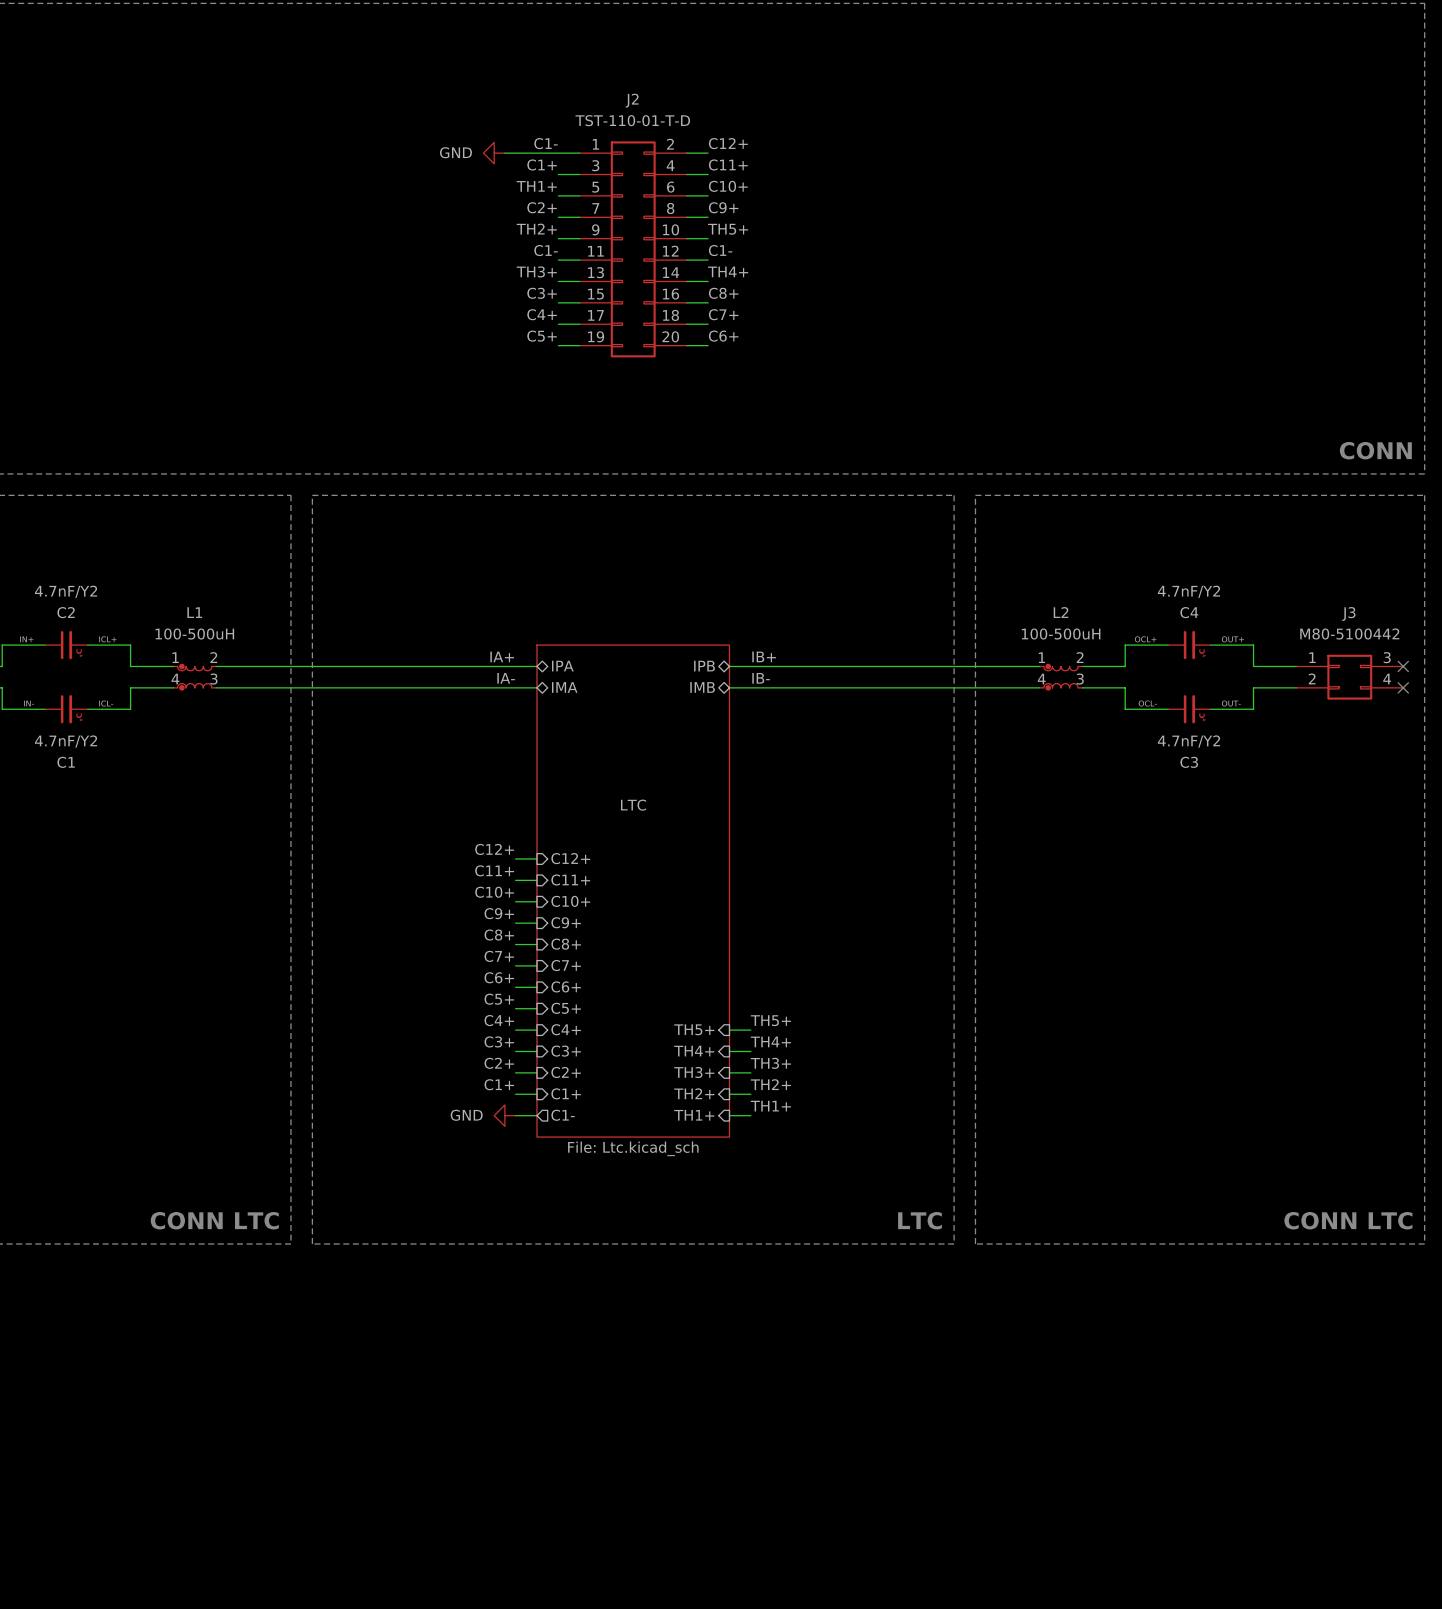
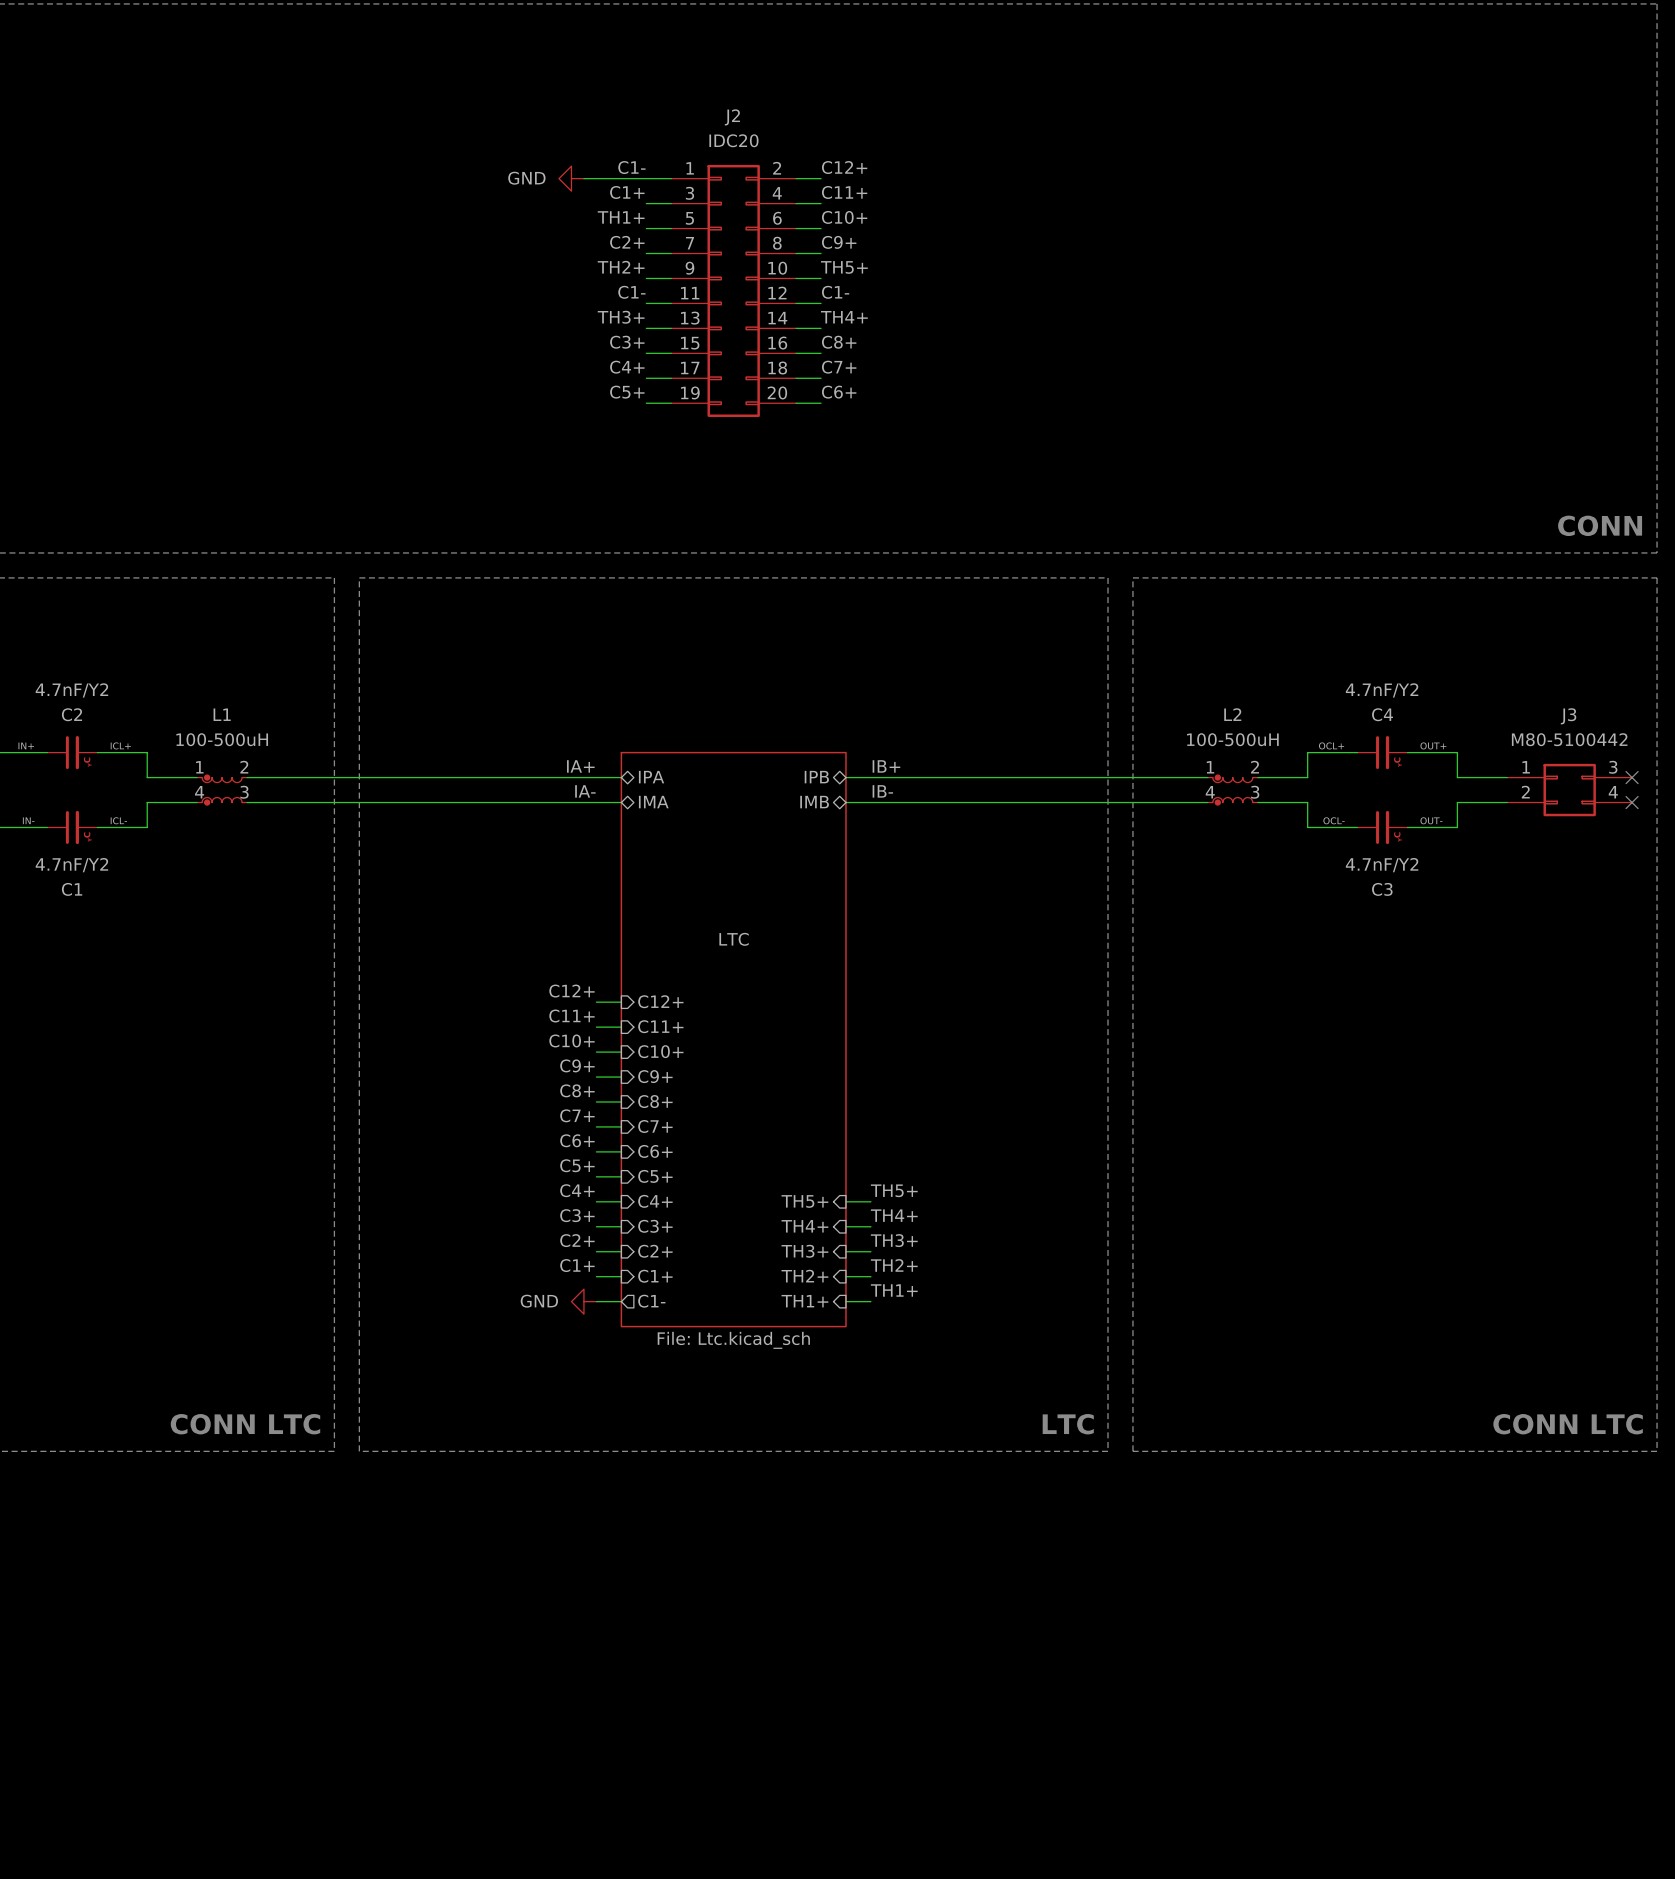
J2 value: TST-110-01-T-D (632, 120) -> IDC20 (733, 140)

